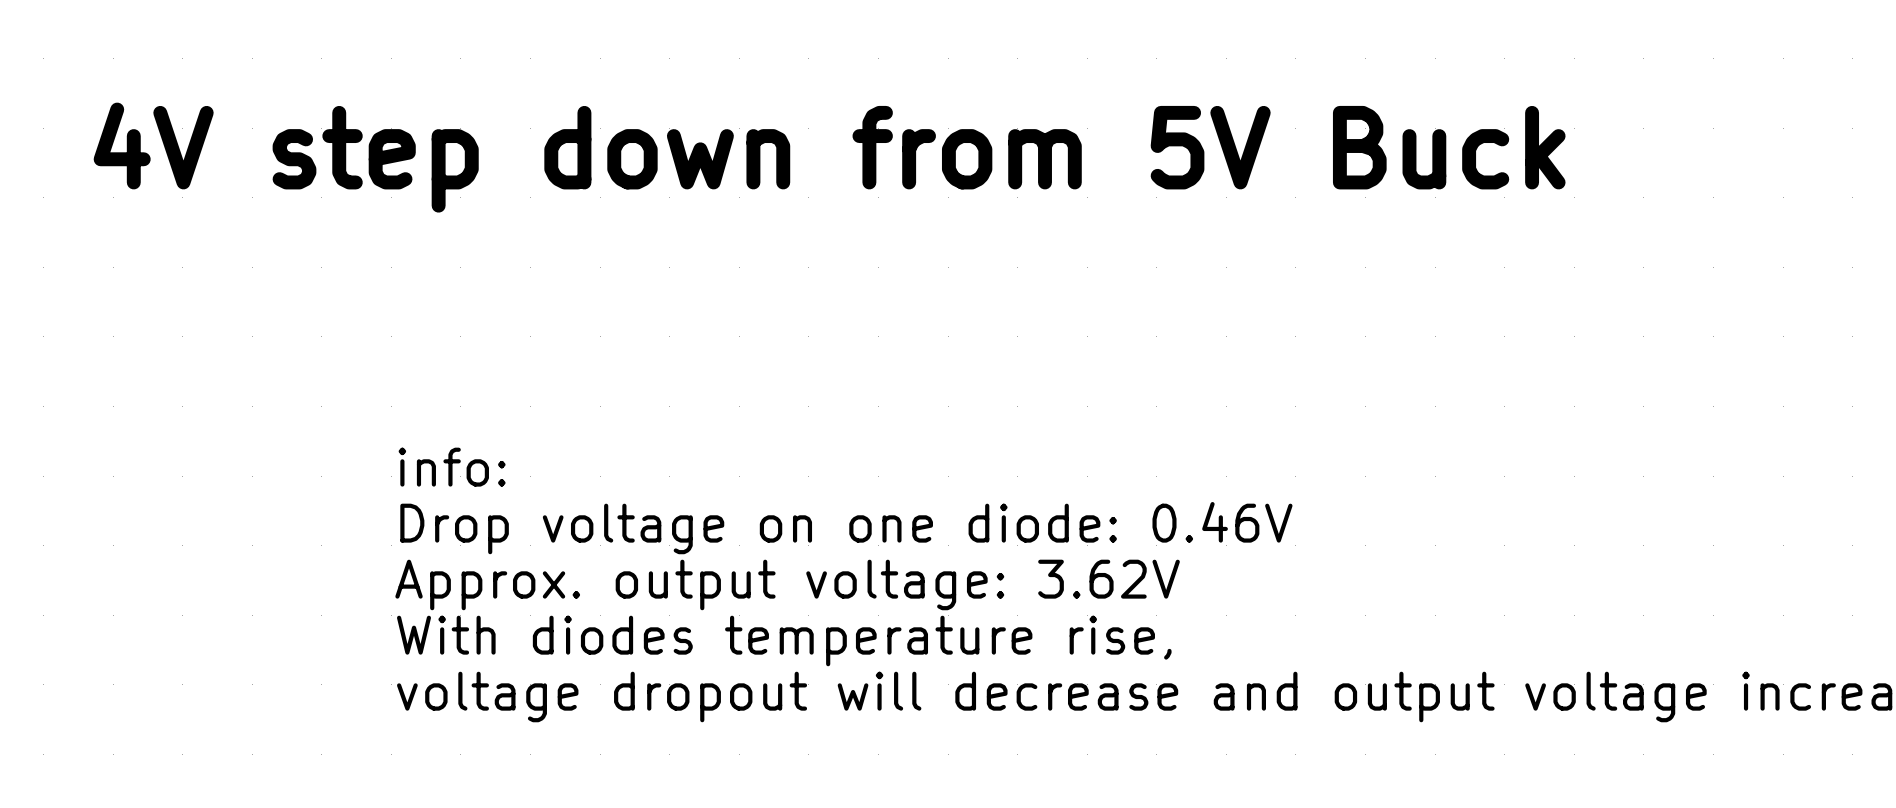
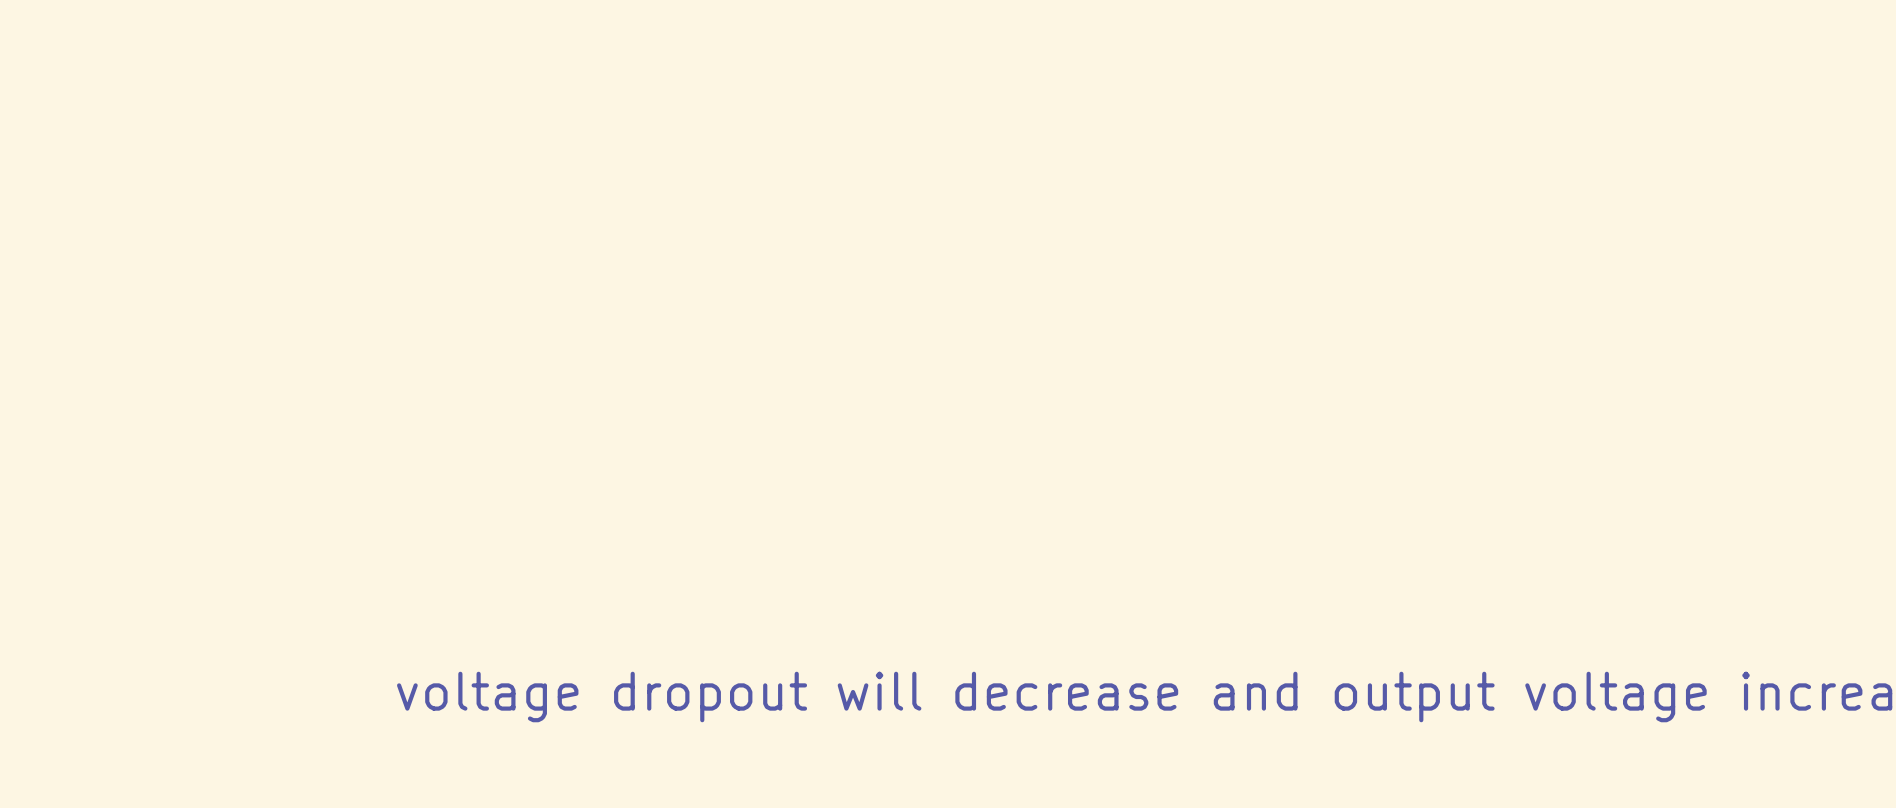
text: 4V step down from 5V Buck (829, 157) -> none
text: info: (452, 467) -> none
text: Drop voltage on one diode: 0.46V (846, 528) -> none
text: Approx. output voltage: 3.62V (787, 584) -> none
text: With diodes temperature rise, (784, 640) -> none

